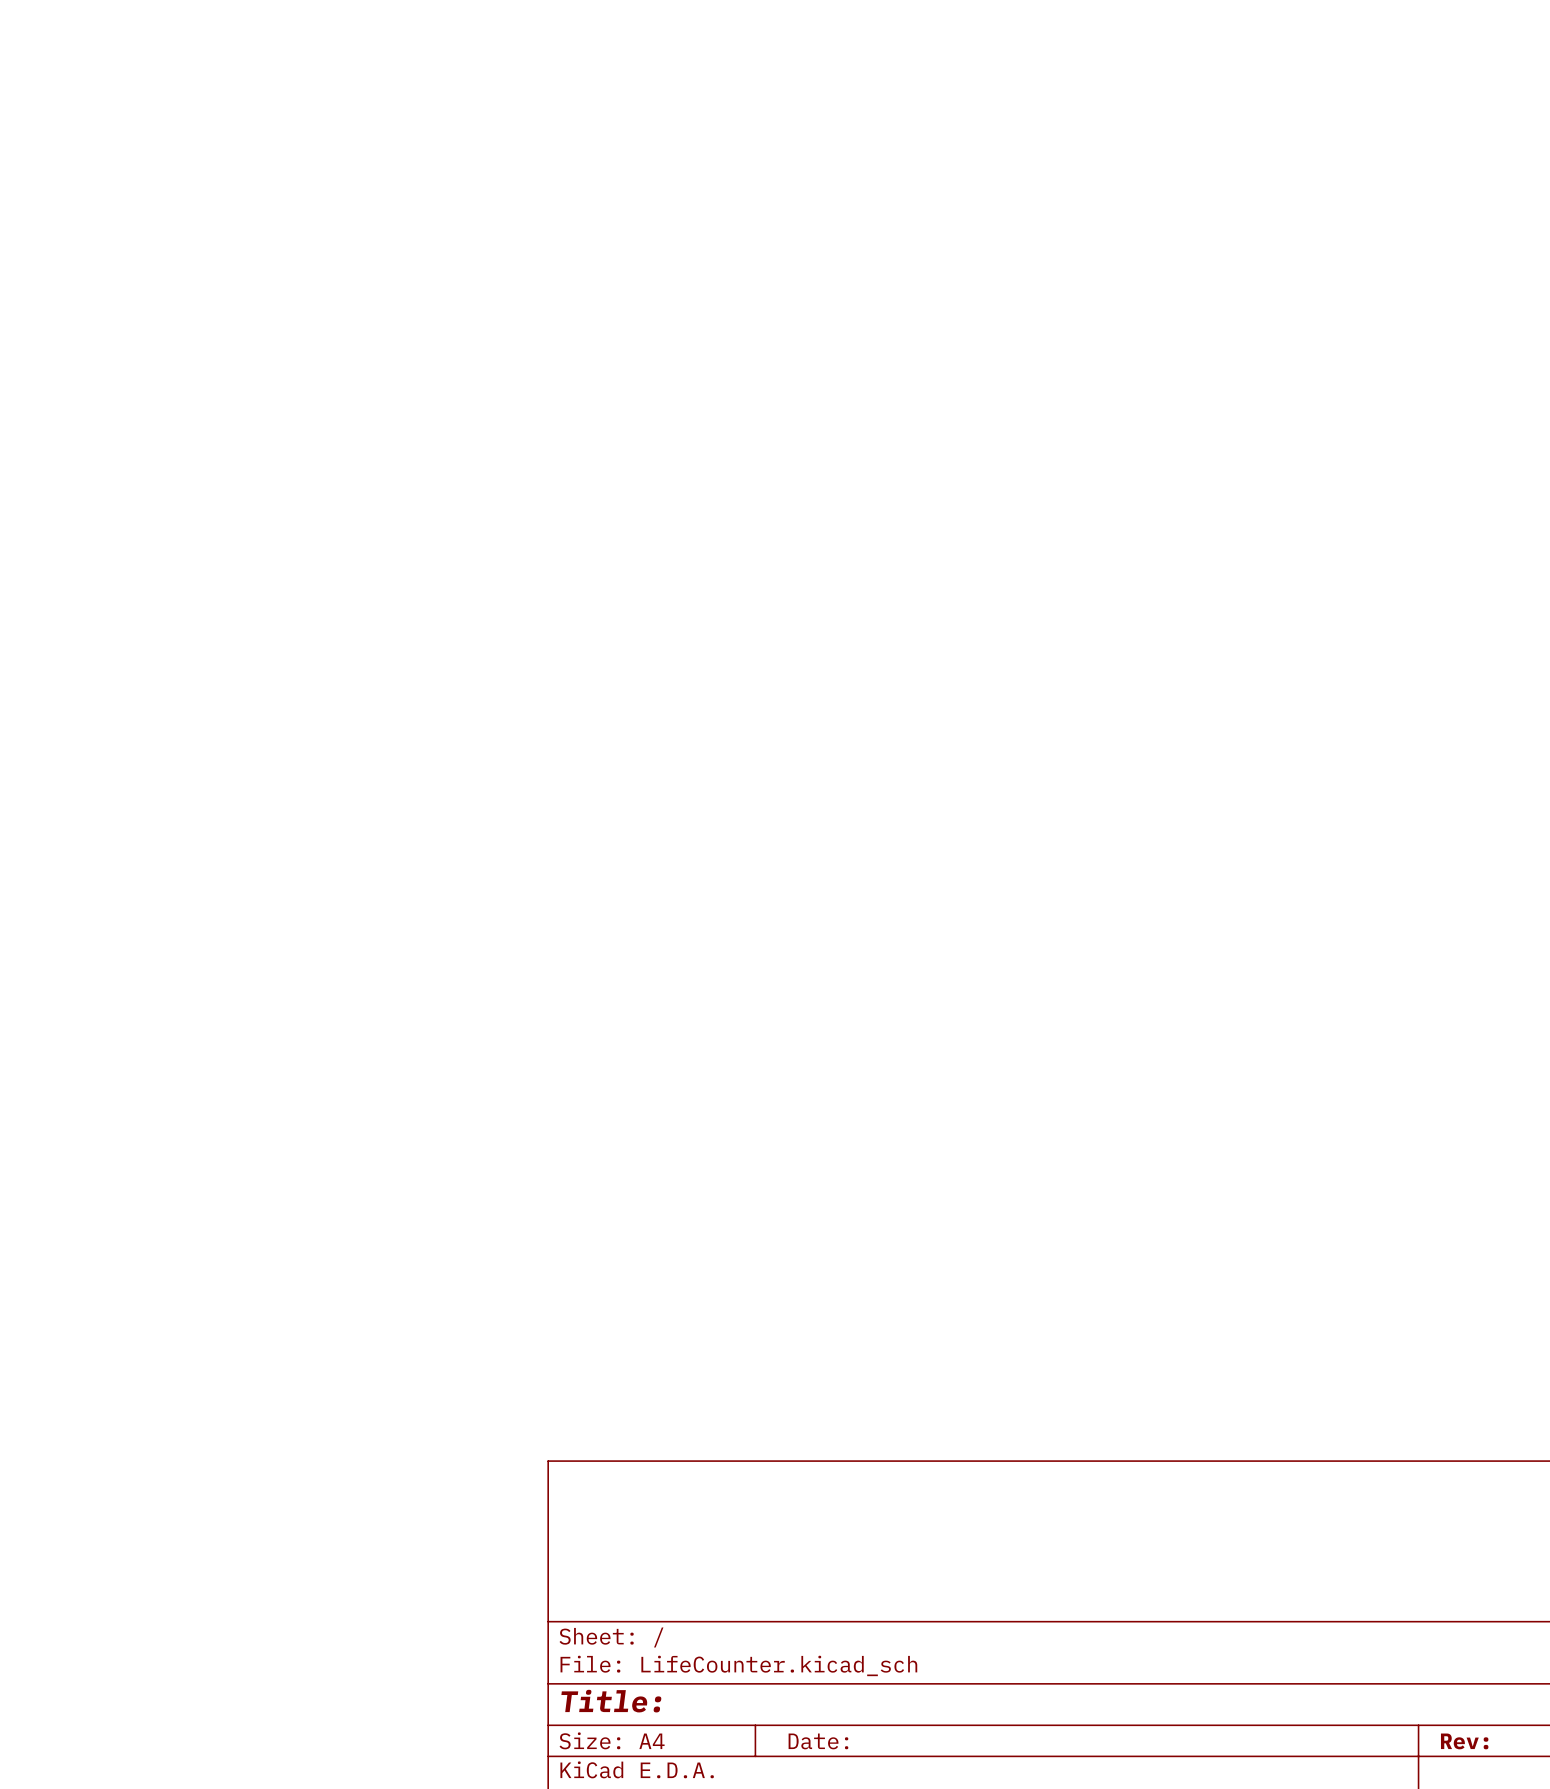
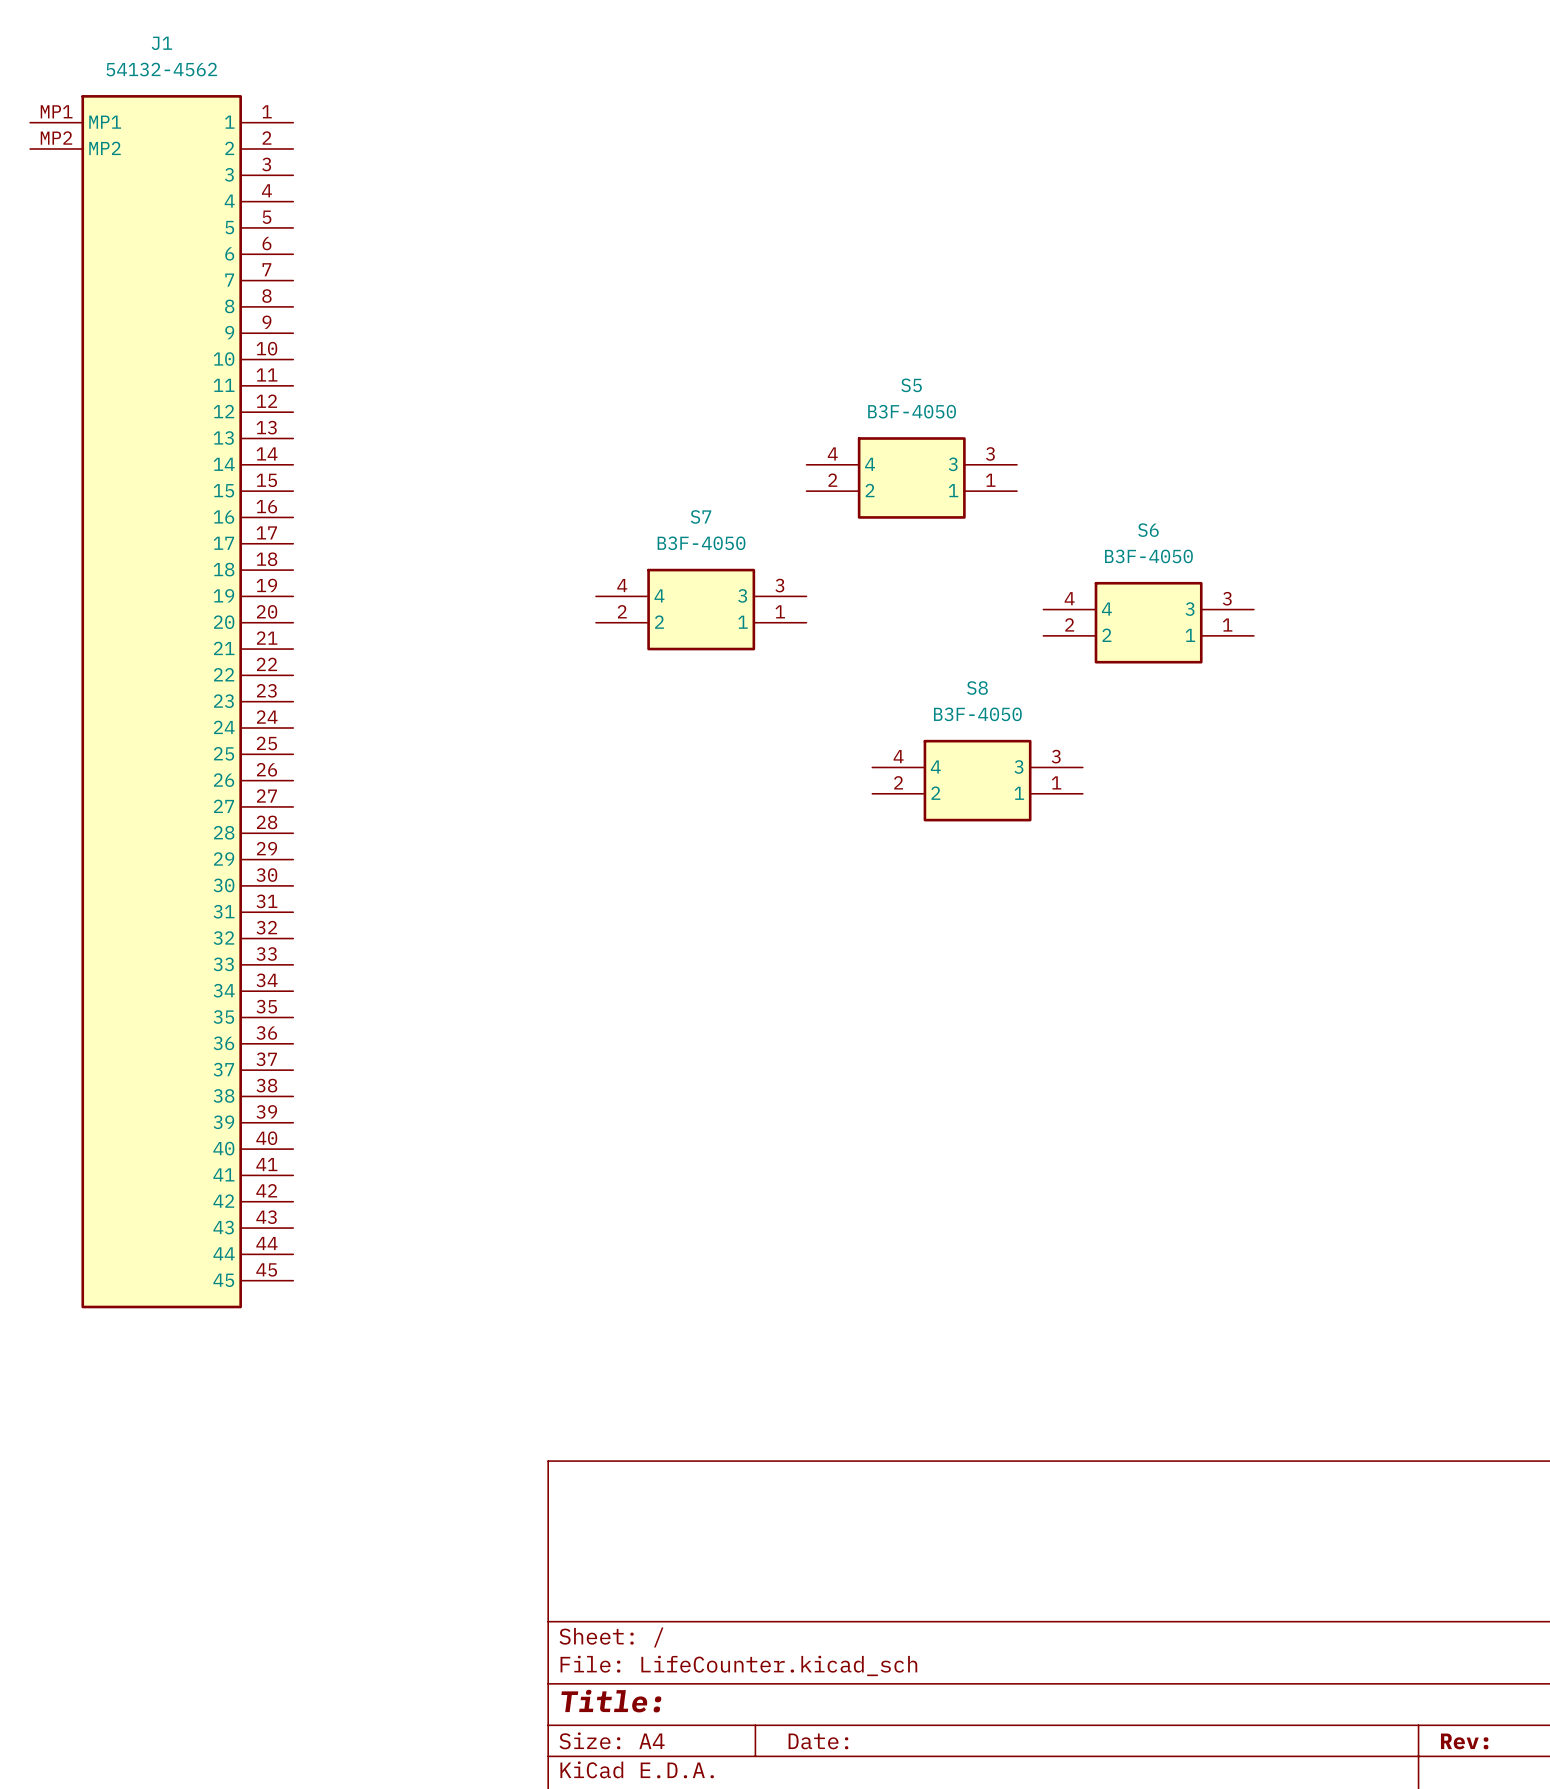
S5: none -> B3F-4050 (911, 477)
S7: none -> B3F-4050 (701, 609)
S6: none -> B3F-4050 (1148, 622)
J1: none -> 54132-4562 (161, 701)
S8: none -> B3F-4050 (977, 780)

